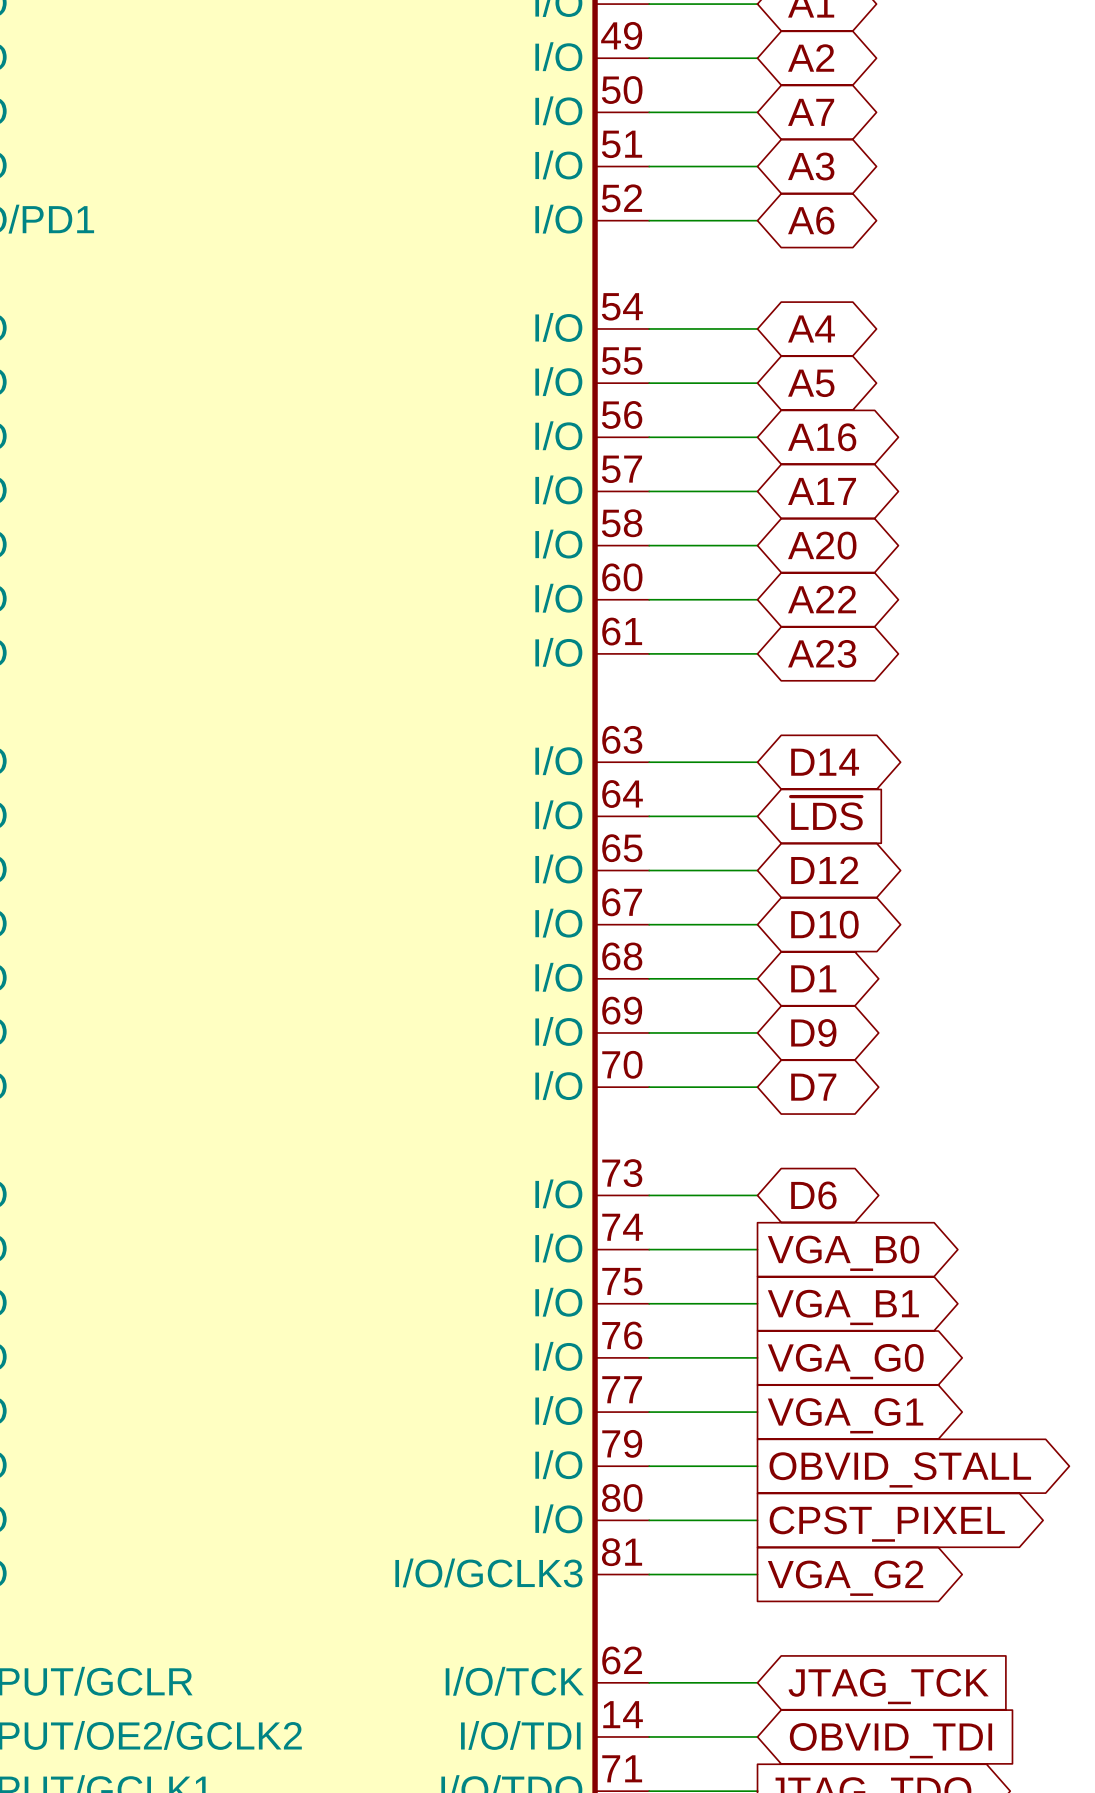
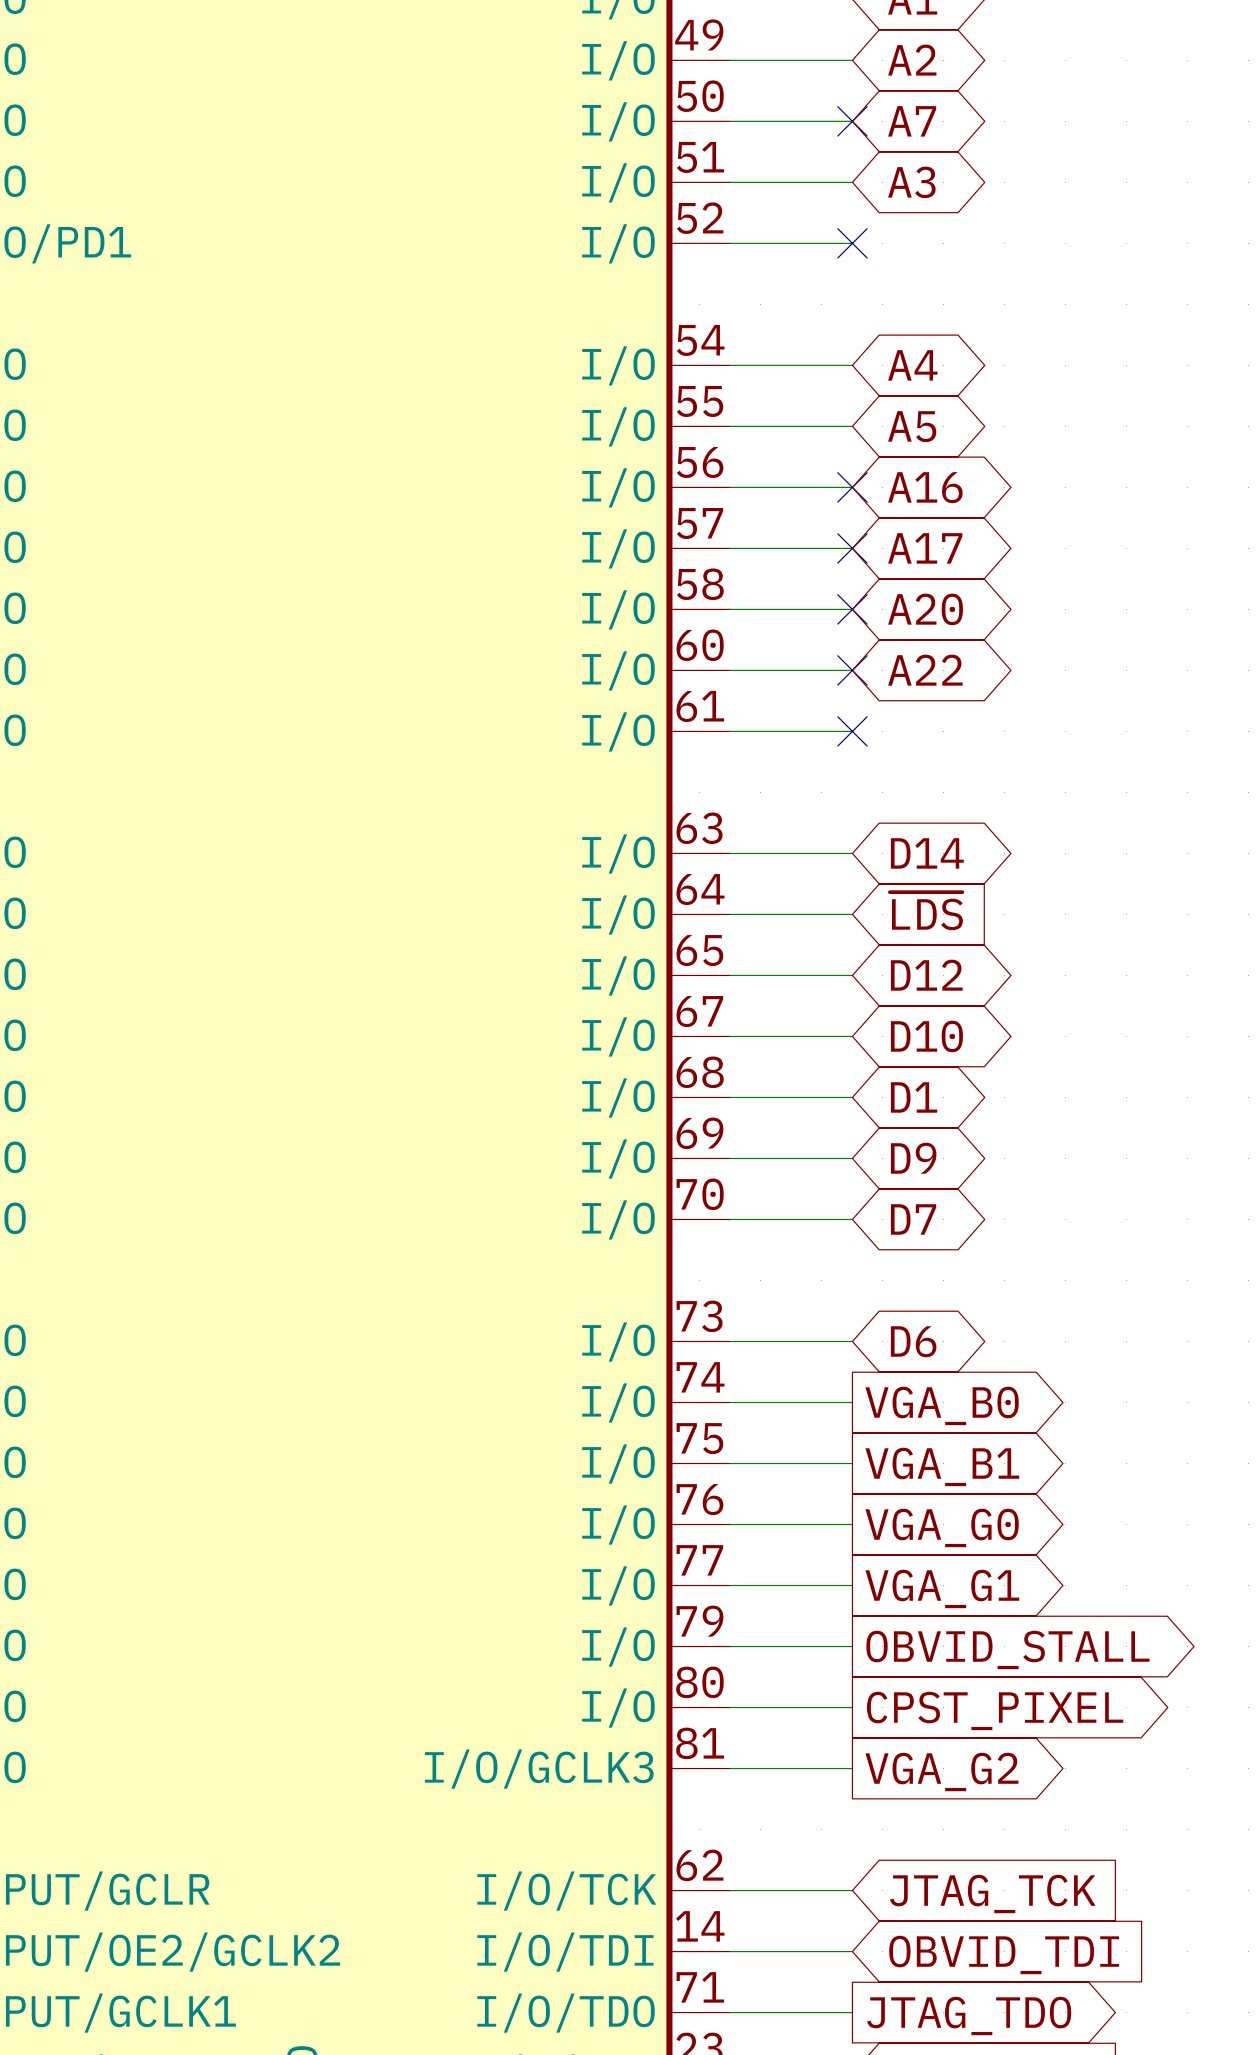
no-connect mark: none -> (852, 121)
no-connect mark: none -> (852, 243)
global label: A6 (811, 220) -> none
no-connect mark: none -> (852, 487)
no-connect mark: none -> (852, 548)
no-connect mark: none -> (852, 609)
no-connect mark: none -> (852, 670)
no-connect mark: none -> (852, 731)
global label: A23 (822, 653) -> none

